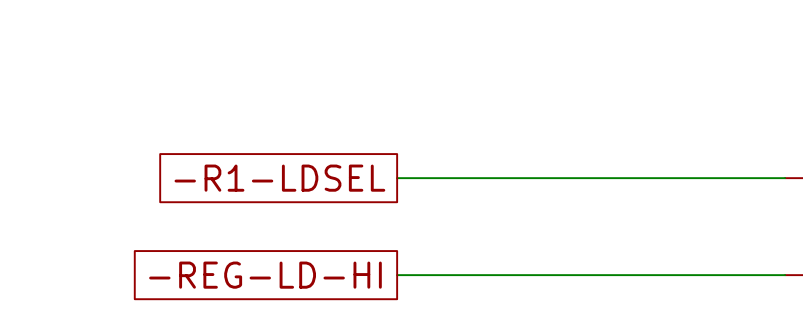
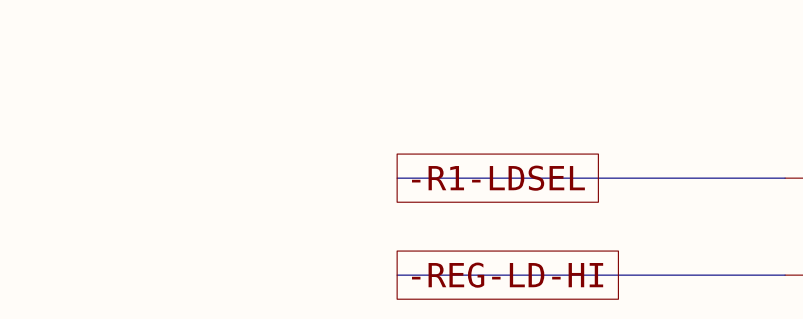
global label rotation: 0° (279, 178) -> 180° (498, 178)
global label rotation: 0° (265, 275) -> 180° (507, 275)

